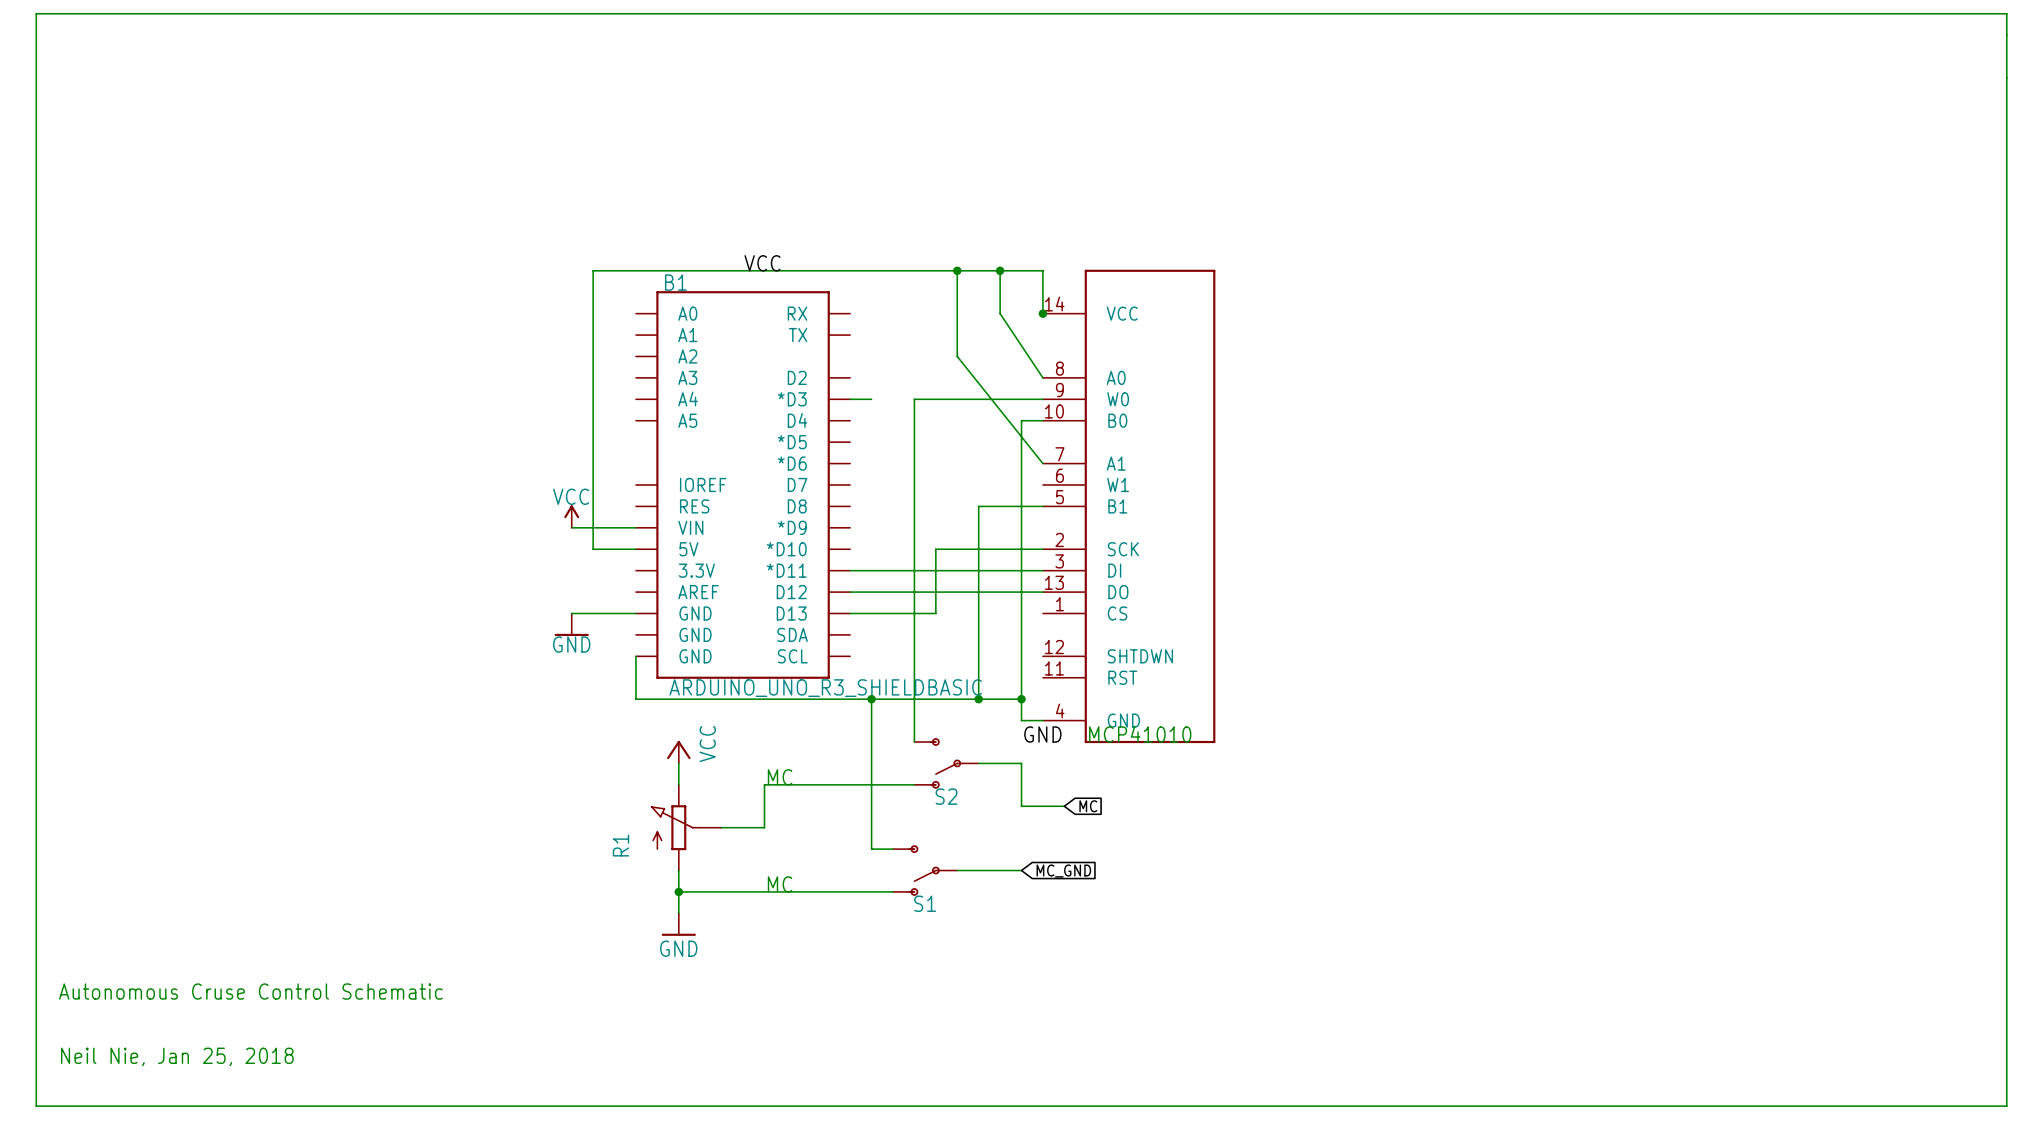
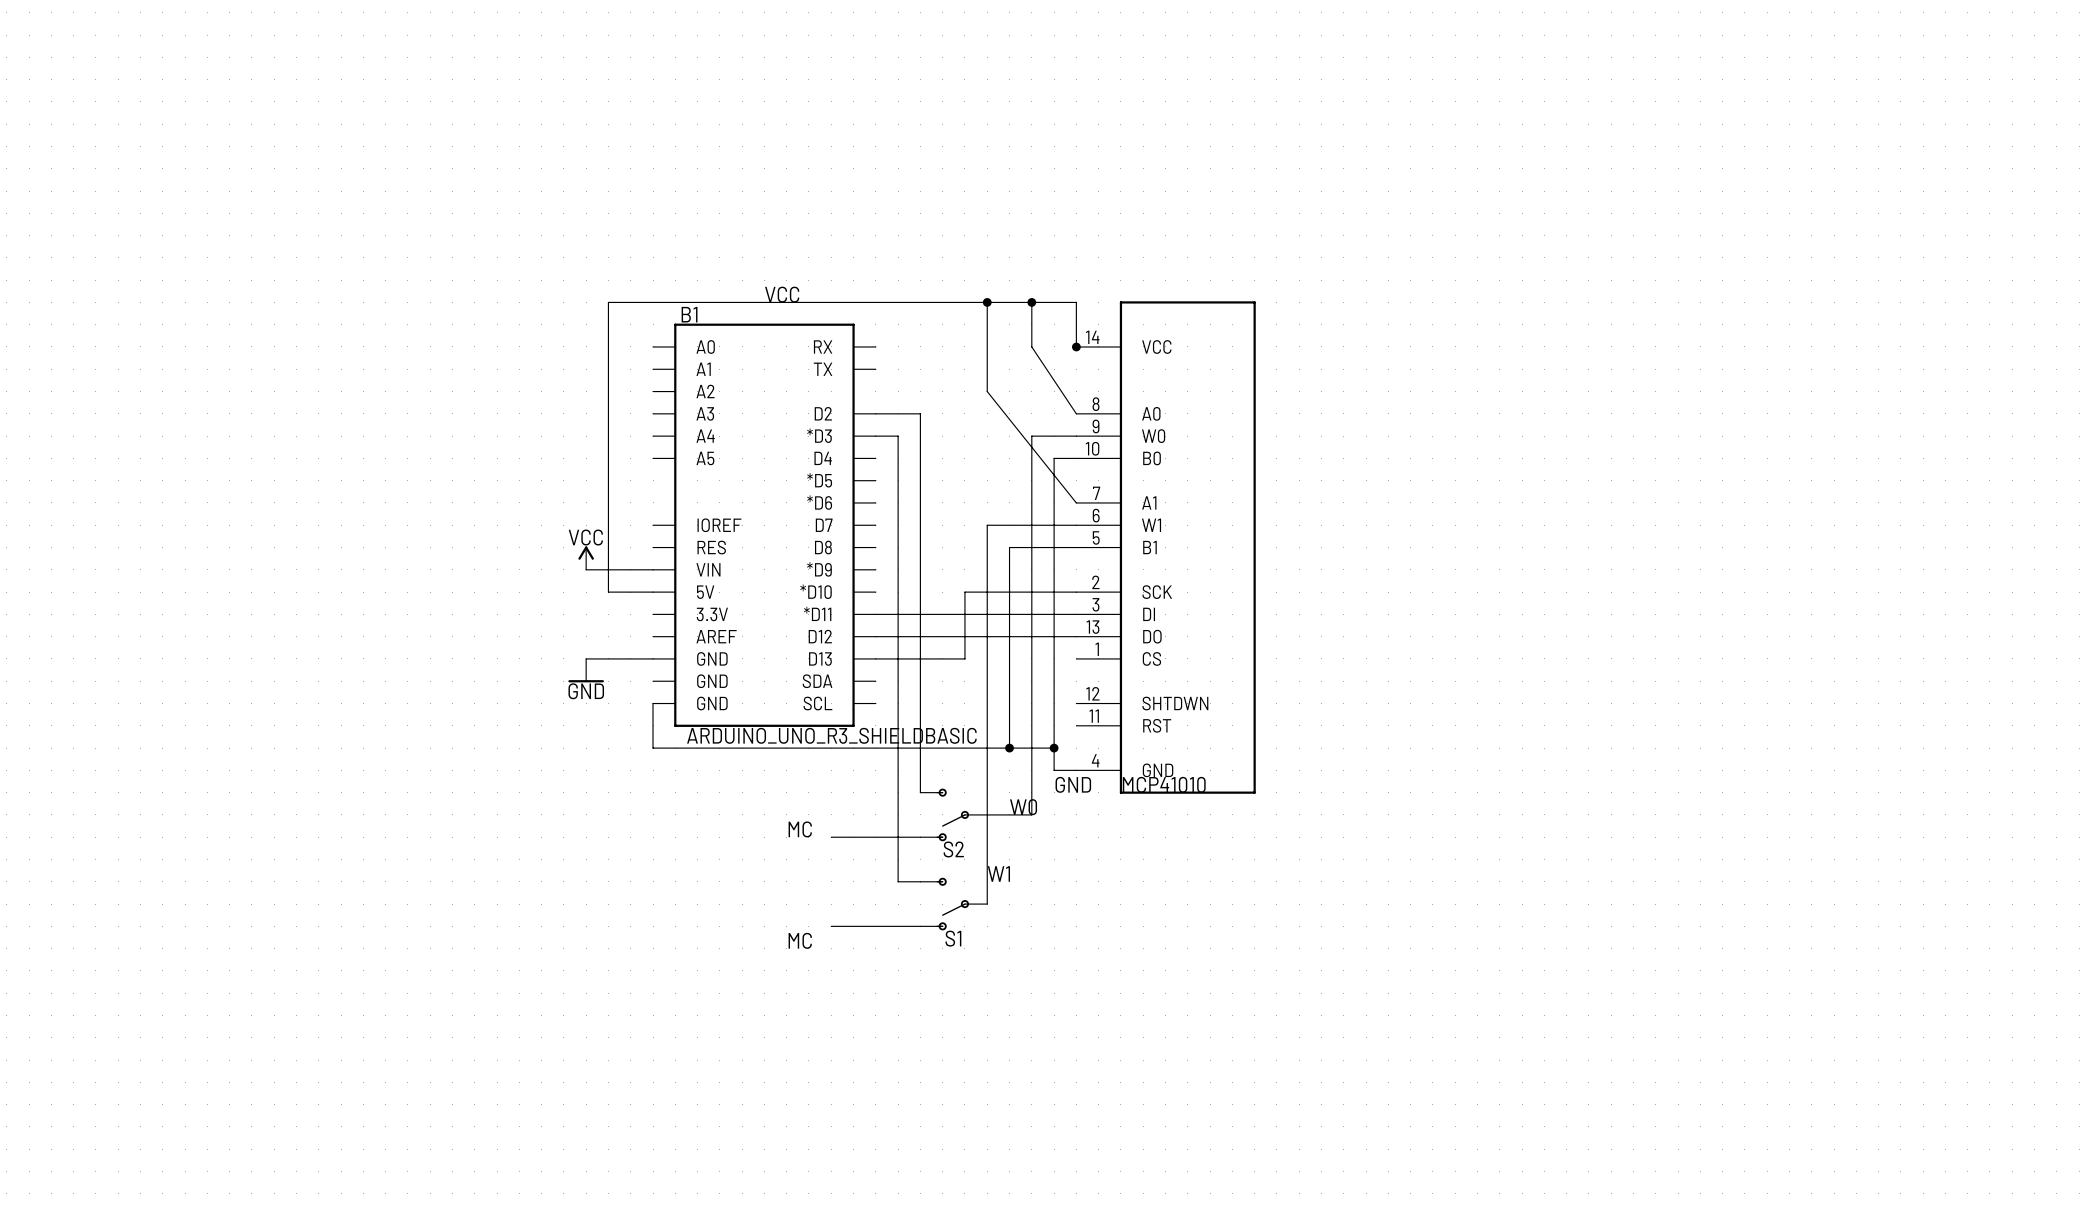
wire: (36, 13) (36, 1106) (2006, 1106) (2006, 13) (36, 13) -> none
wire: none -> (875, 413) (920, 413) (920, 792)
wire: none -> (898, 436) (898, 748)
wire: (1000, 399) (914, 399) (914, 742) -> (1031, 436) (1031, 814)
wire: none -> (1076, 525) (987, 525) (987, 904)
junction: (871, 699) -> none
power symbol: VCC (678, 752) -> none
label: none -> W0 (1023, 807)
wire: (678, 763) (678, 784) -> none
S2 position: (946, 763) -> (953, 814)
wire: (1000, 763) (1021, 763) (1021, 806) (1064, 806) -> none
wire: (807, 784) (764, 784) (764, 827) (721, 827) -> none
global label: MC (1088, 806) -> none
label: none -> W1 (998, 873)
R1: (686, 827) -> none
wire: (871, 827) (871, 849) (893, 849) -> (898, 881) (920, 881)
wire: (678, 870) (678, 913) -> none
wire: none -> (831, 926) (920, 926)
S1 position: (925, 870) -> (953, 904)
wire: (957, 870) (1021, 870) -> none
global label: MC_GND (1063, 871) -> none
wire: (678, 891) (893, 891) -> none
junction: (678, 891) -> none
power symbol: GND (678, 924) -> none
text: Autonomous Cruse Control Schematic (250, 991) -> none
text: Neil Nie, Jan 25, 2018 (177, 1056) -> none

